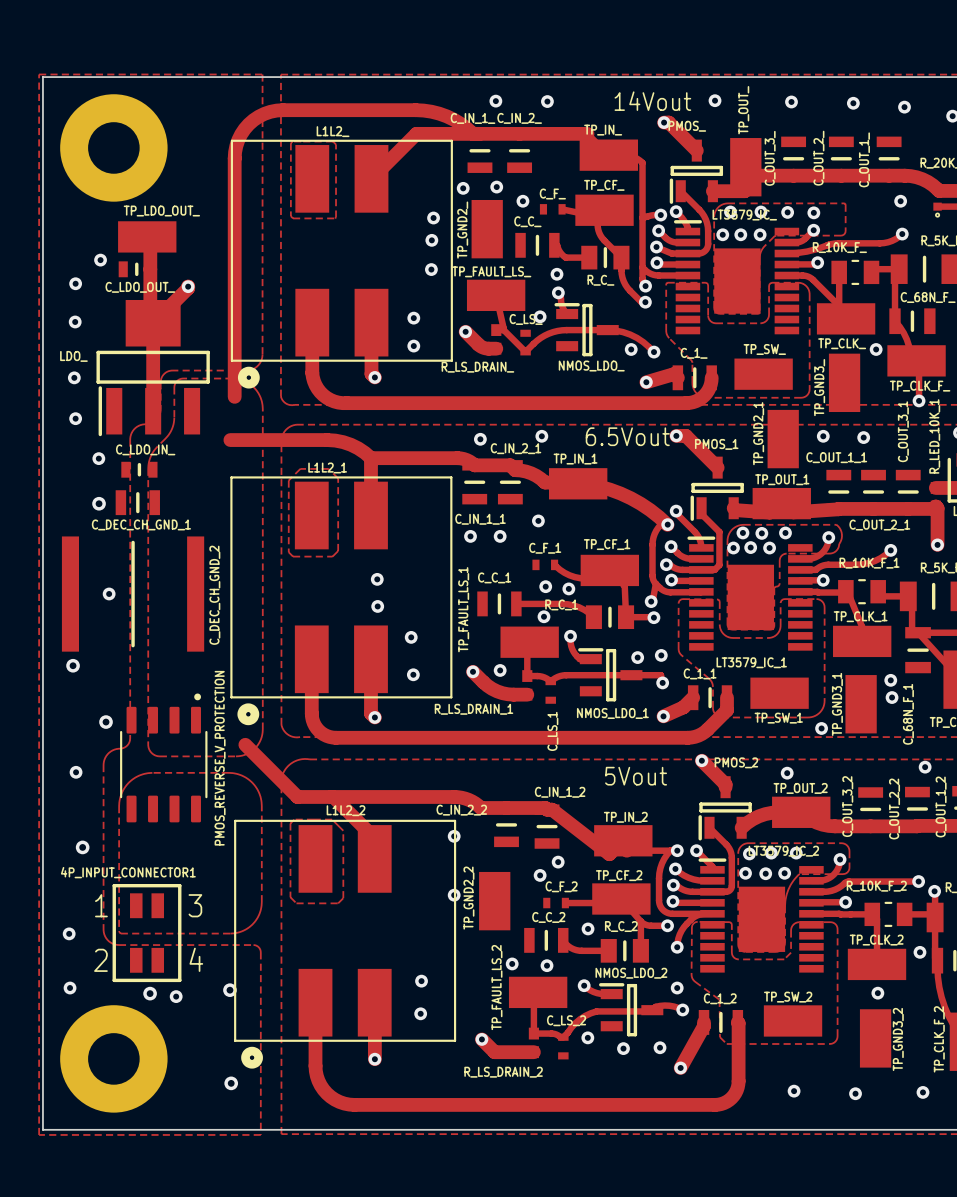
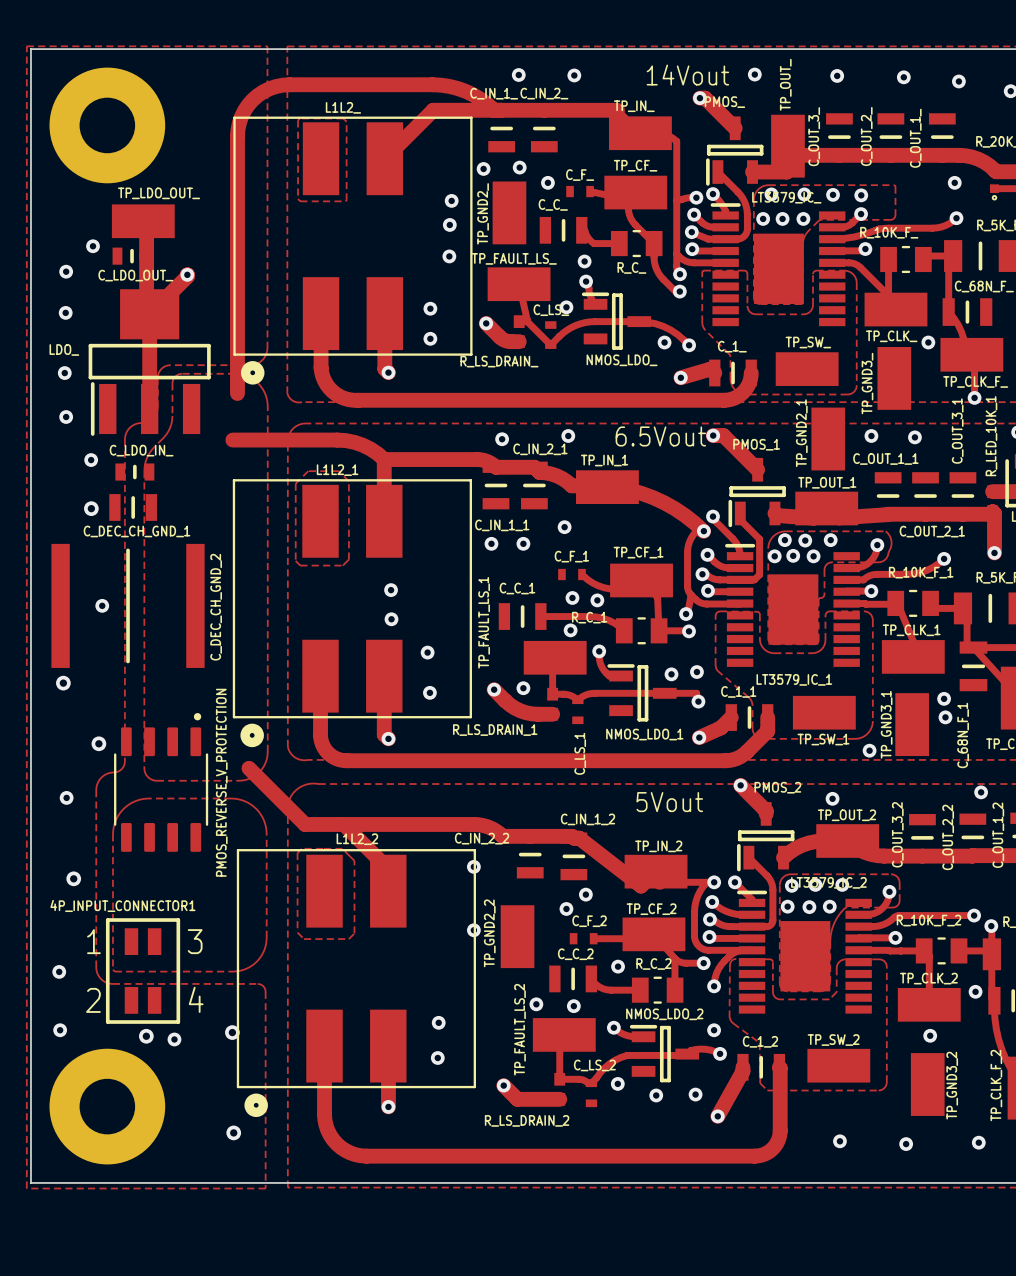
R_C_ footprint: [581, 245, 630, 270] -> [610, 230, 663, 258]
R_C_1 footprint: [585, 605, 635, 630] -> [615, 617, 668, 645]
R_C_2 footprint: [600, 938, 649, 963] -> [631, 976, 684, 1004]

